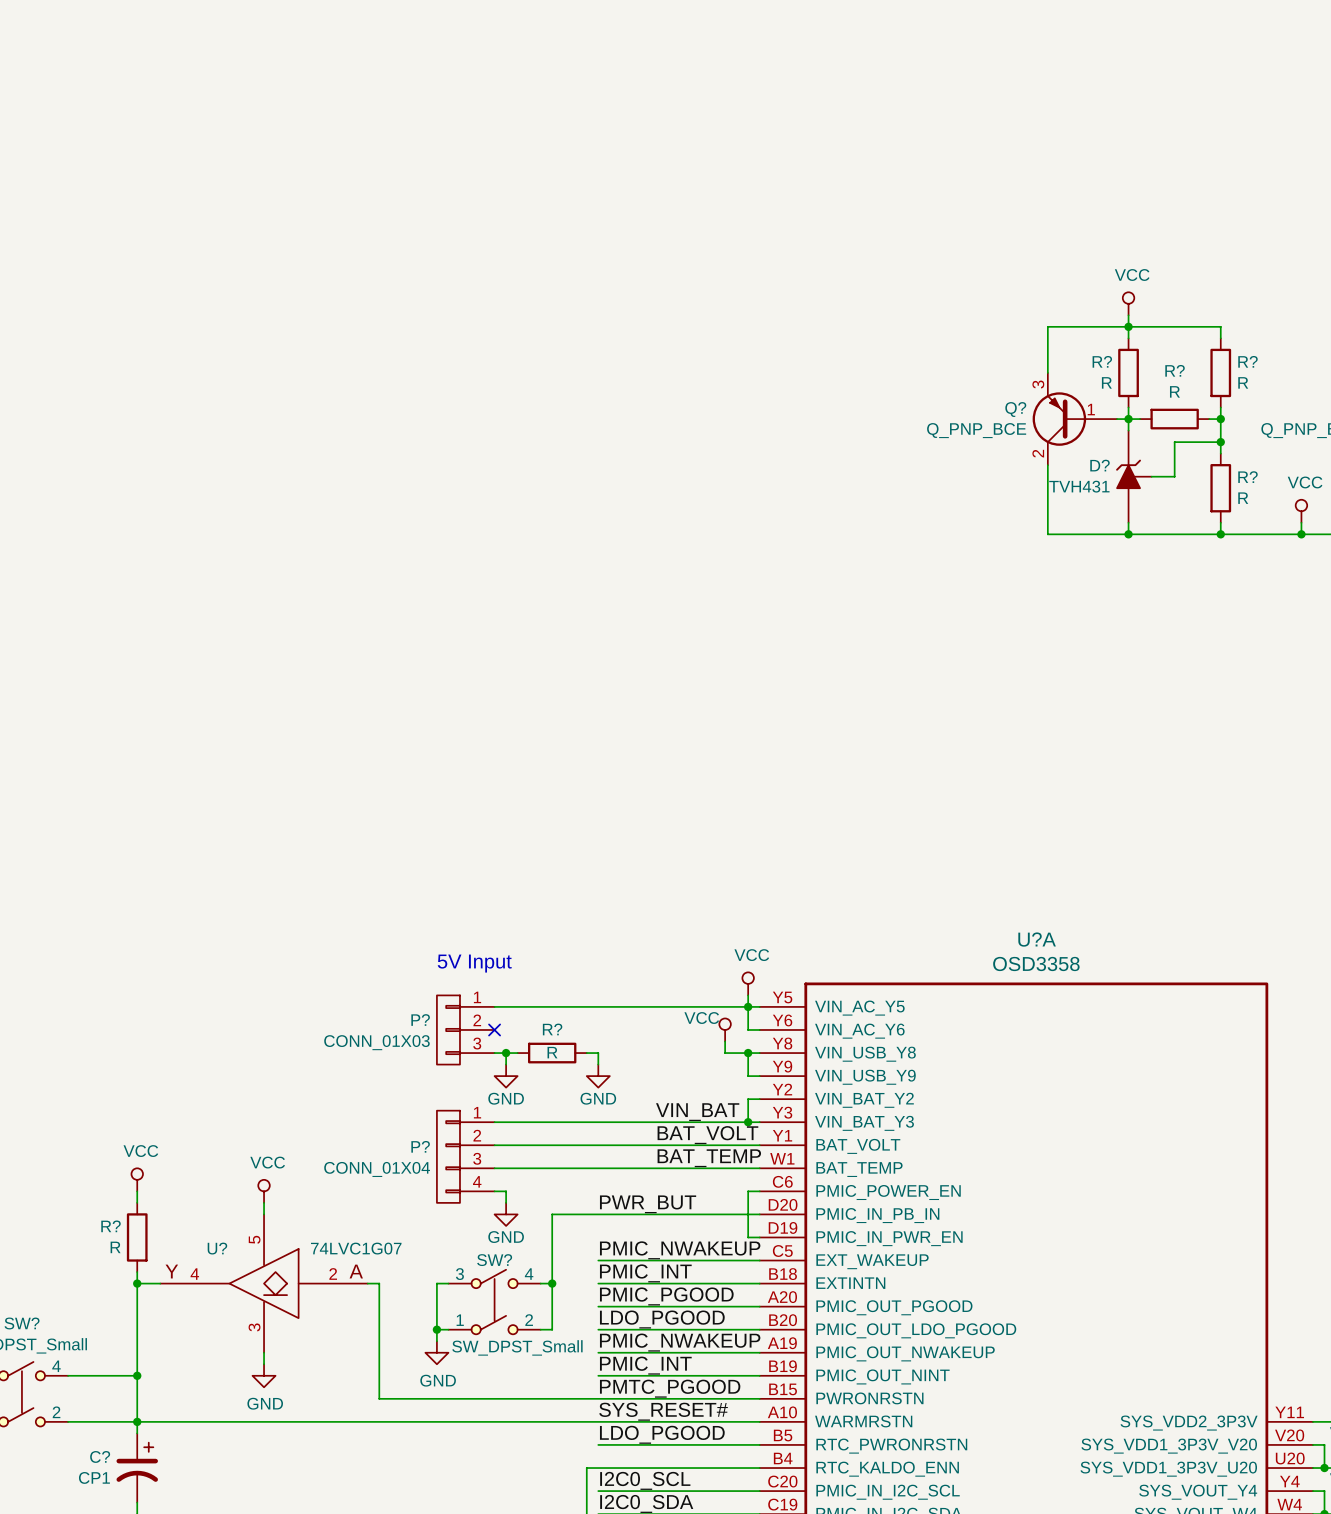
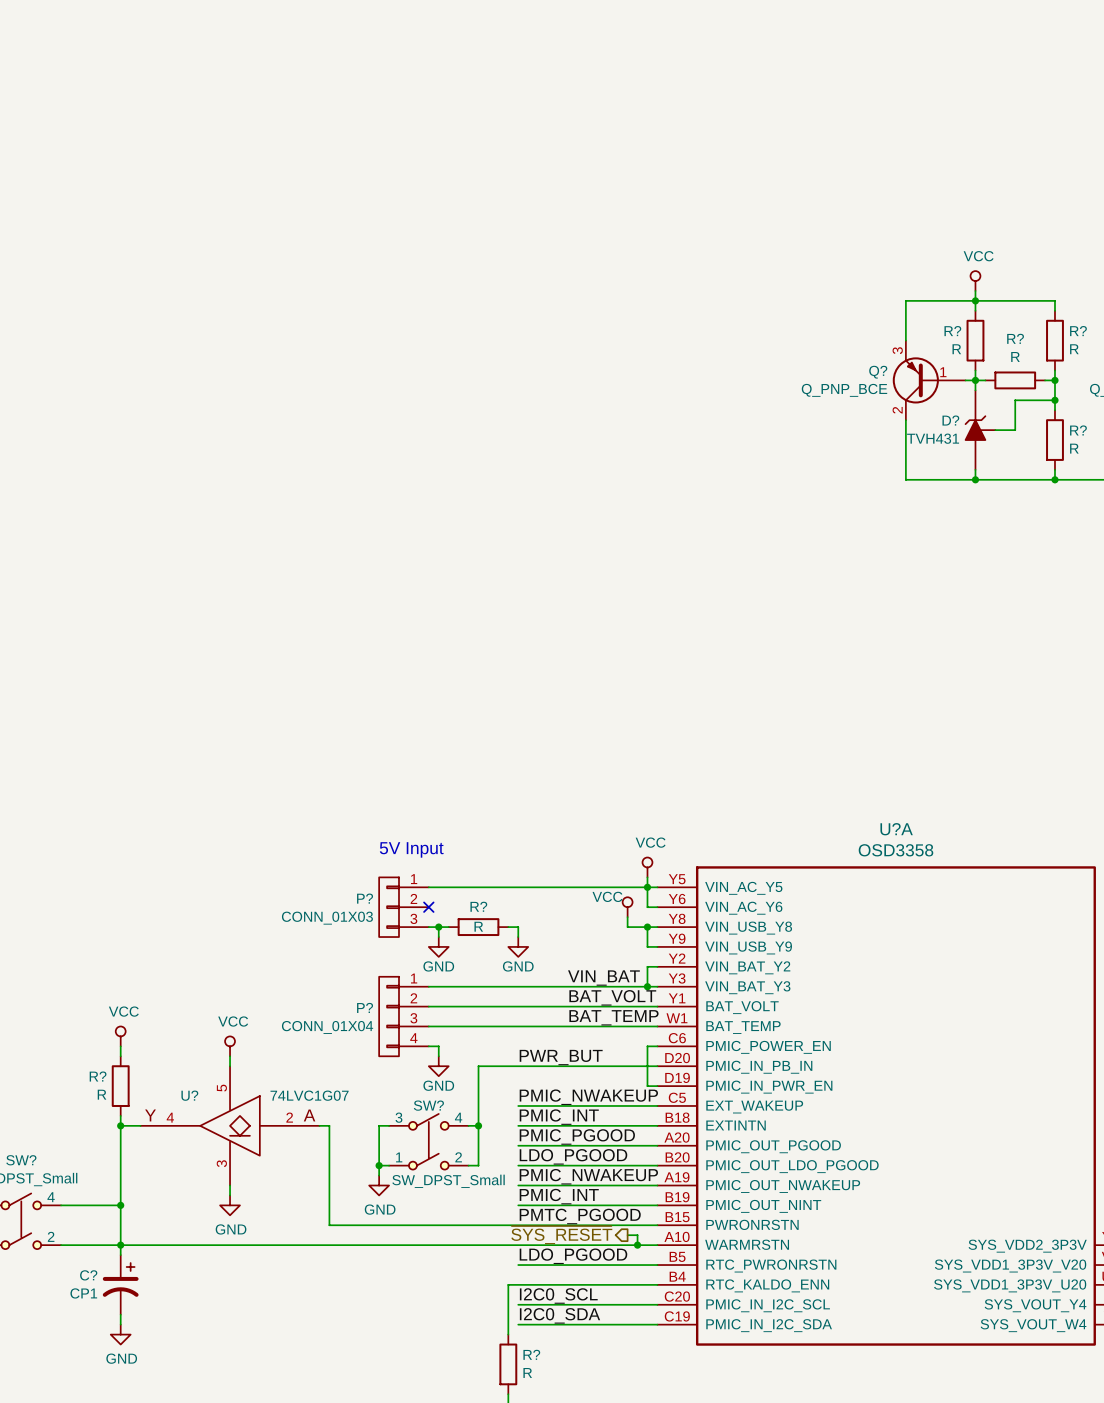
hierarchical label: none -> ~{SYS_RESET} (561, 1235)
wire: none -> (627, 1235) (637, 1235) (637, 1245)
label: SYS_RESET# (663, 1411) -> none
junction: none -> (637, 1245)

